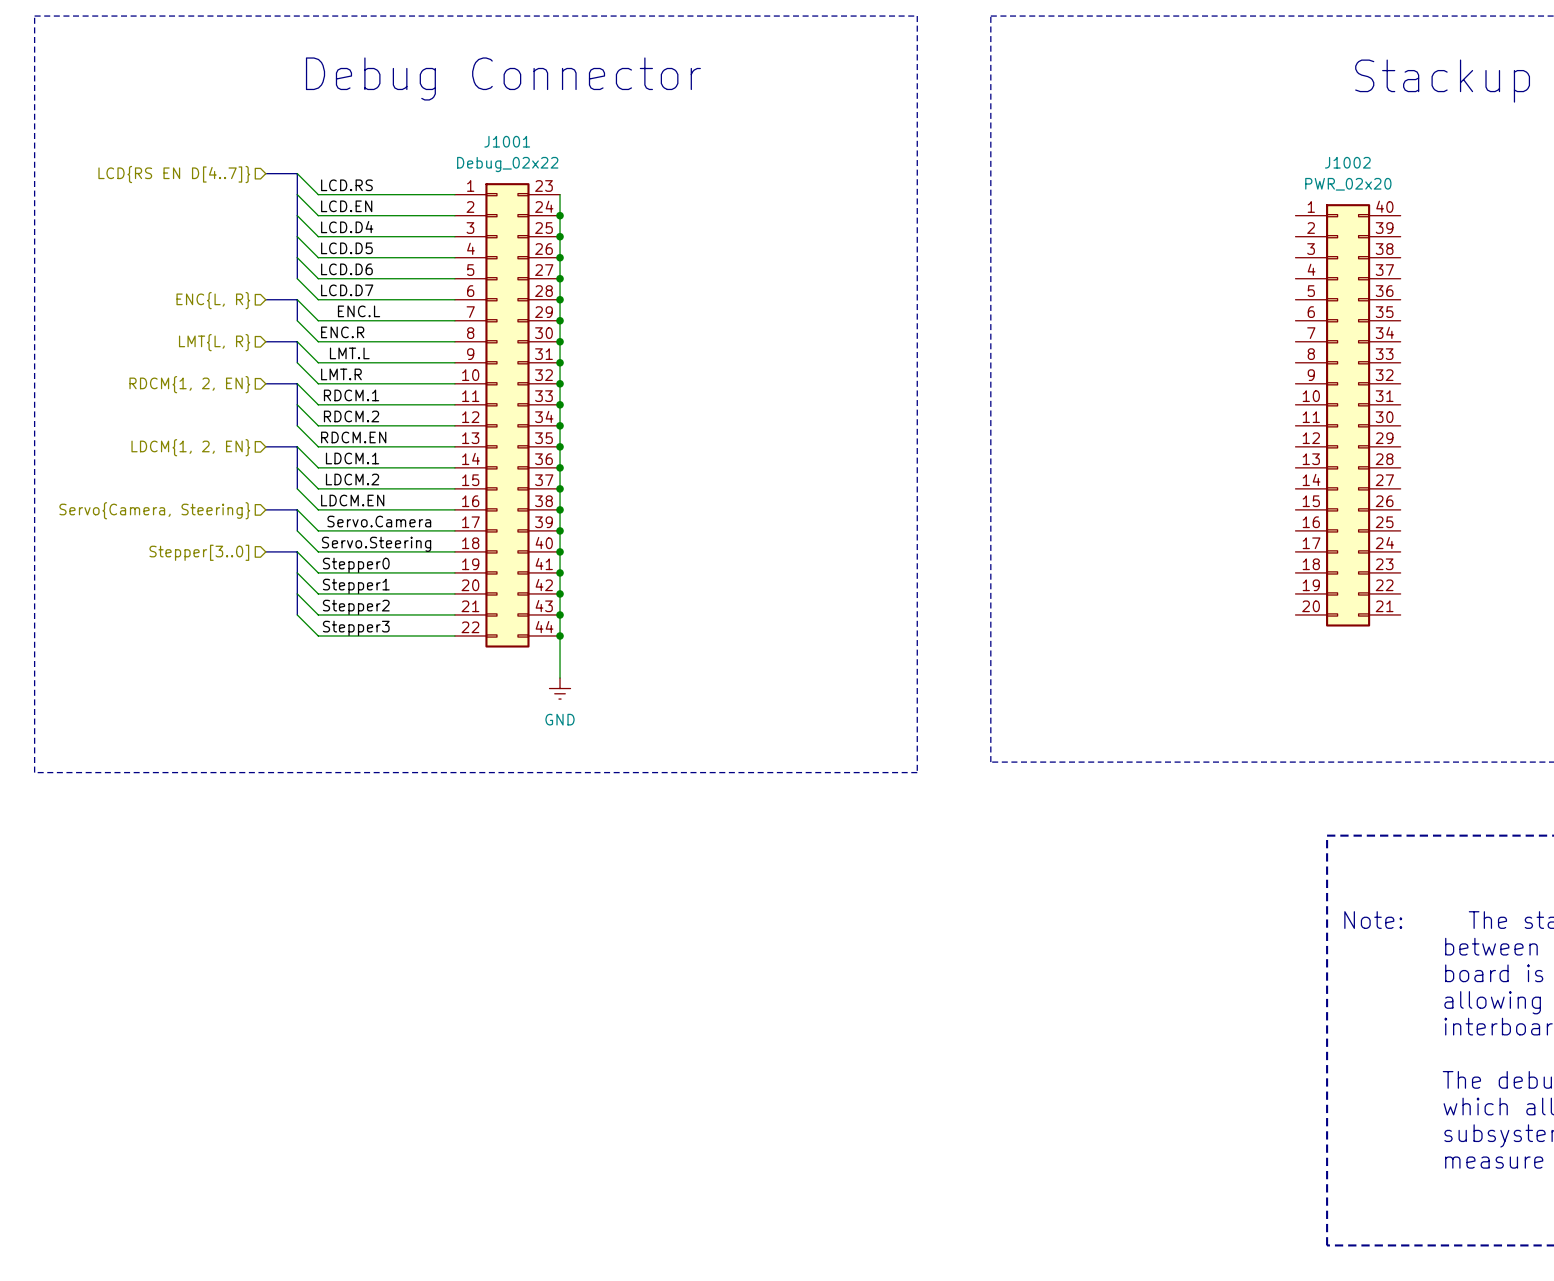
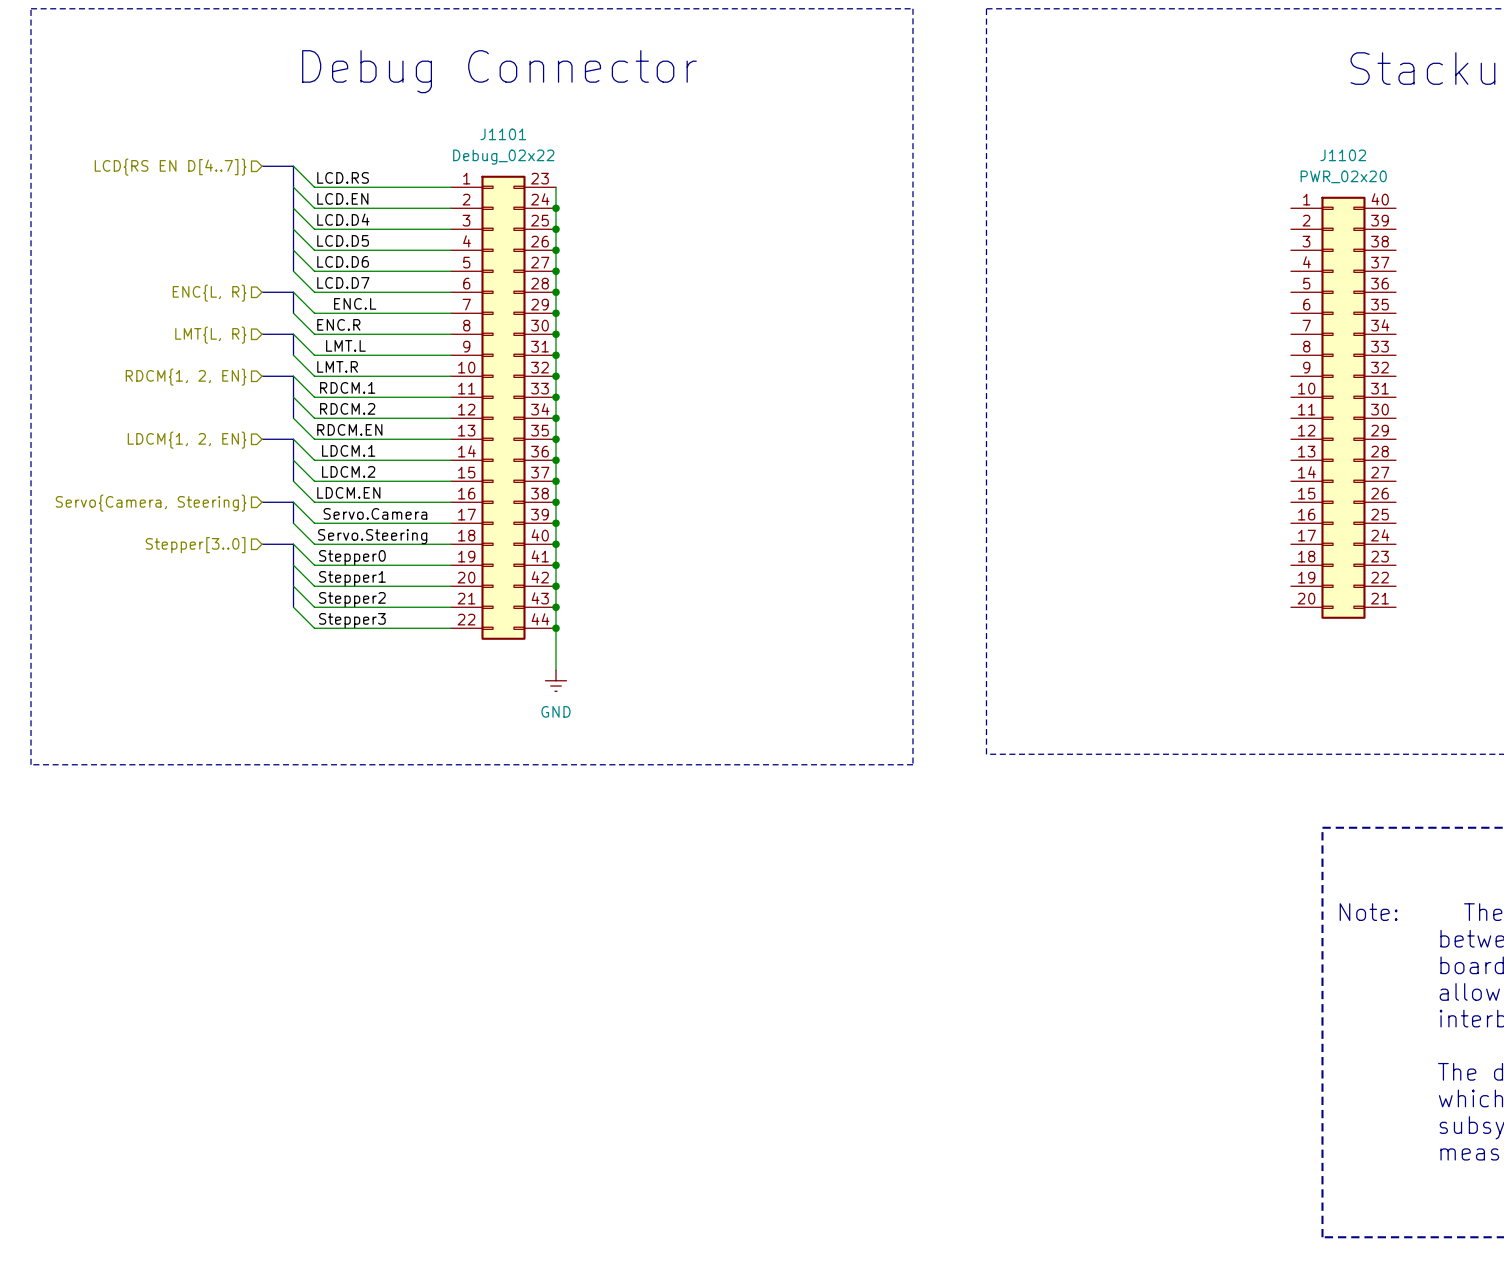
J1001 name: J1001 (507, 141) -> J1101 (503, 134)
J1002 name: J1002 (1347, 162) -> J1102 (1343, 155)

